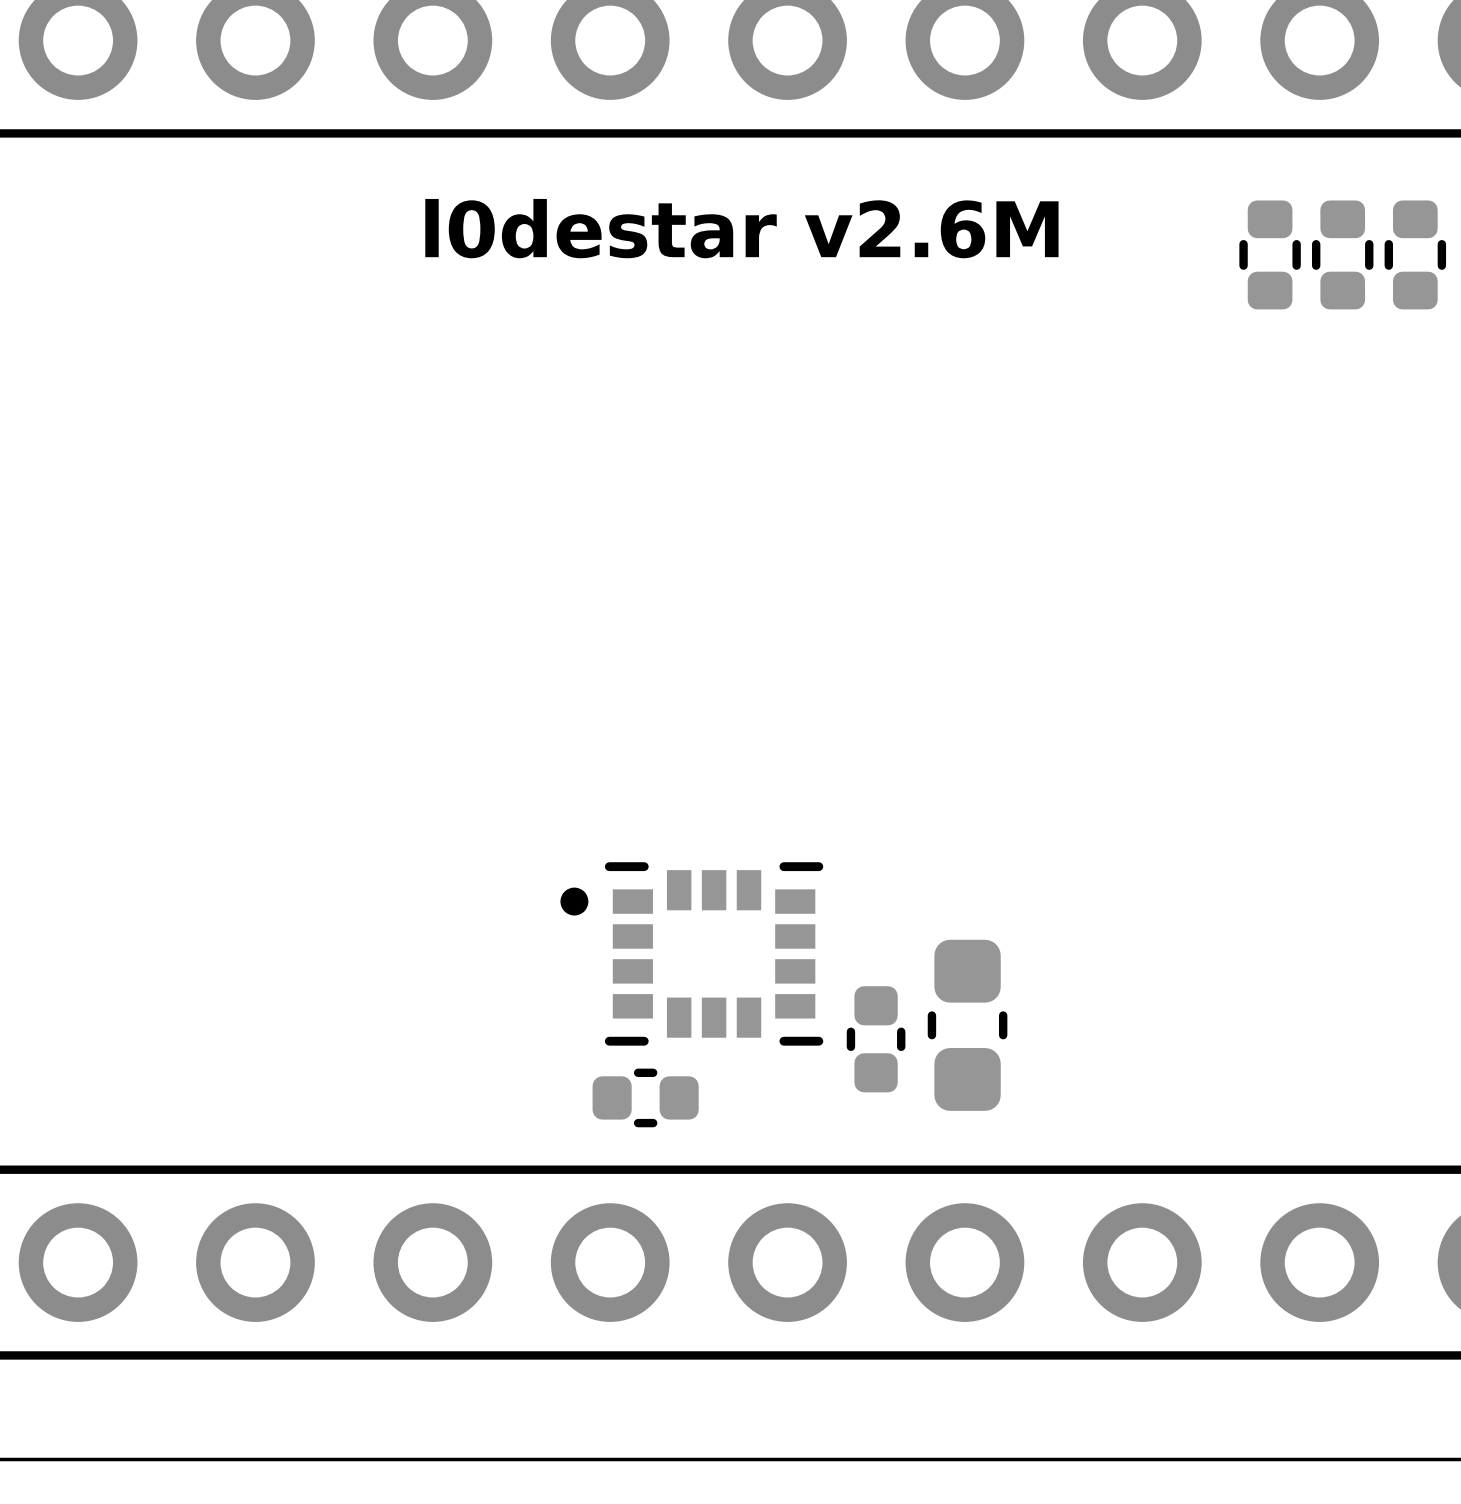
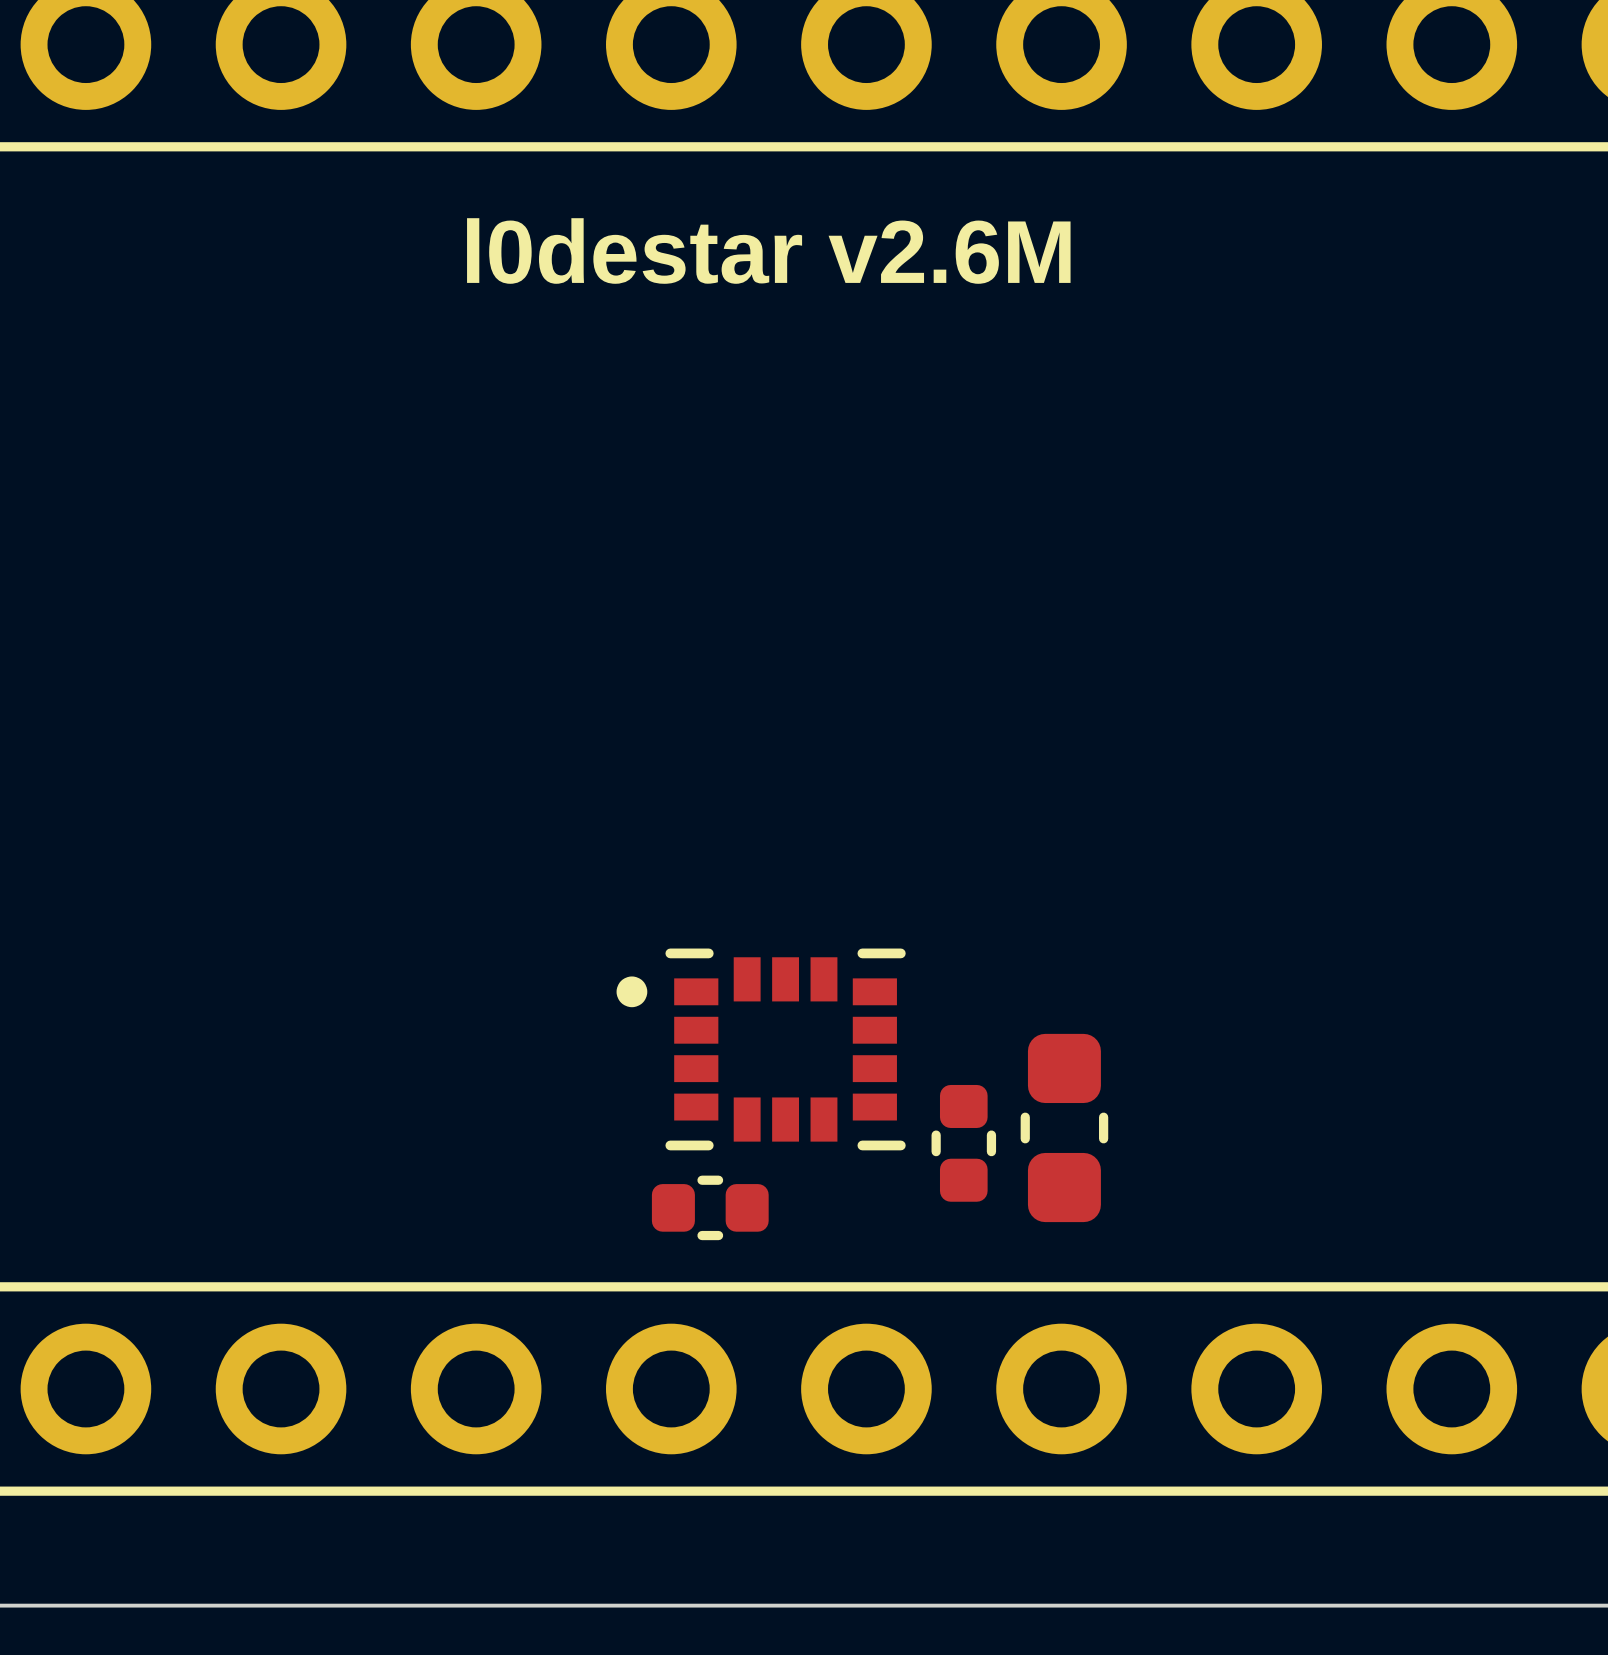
part: (1270, 254) -> none
part: (1342, 254) -> none
part: (1415, 254) -> none

